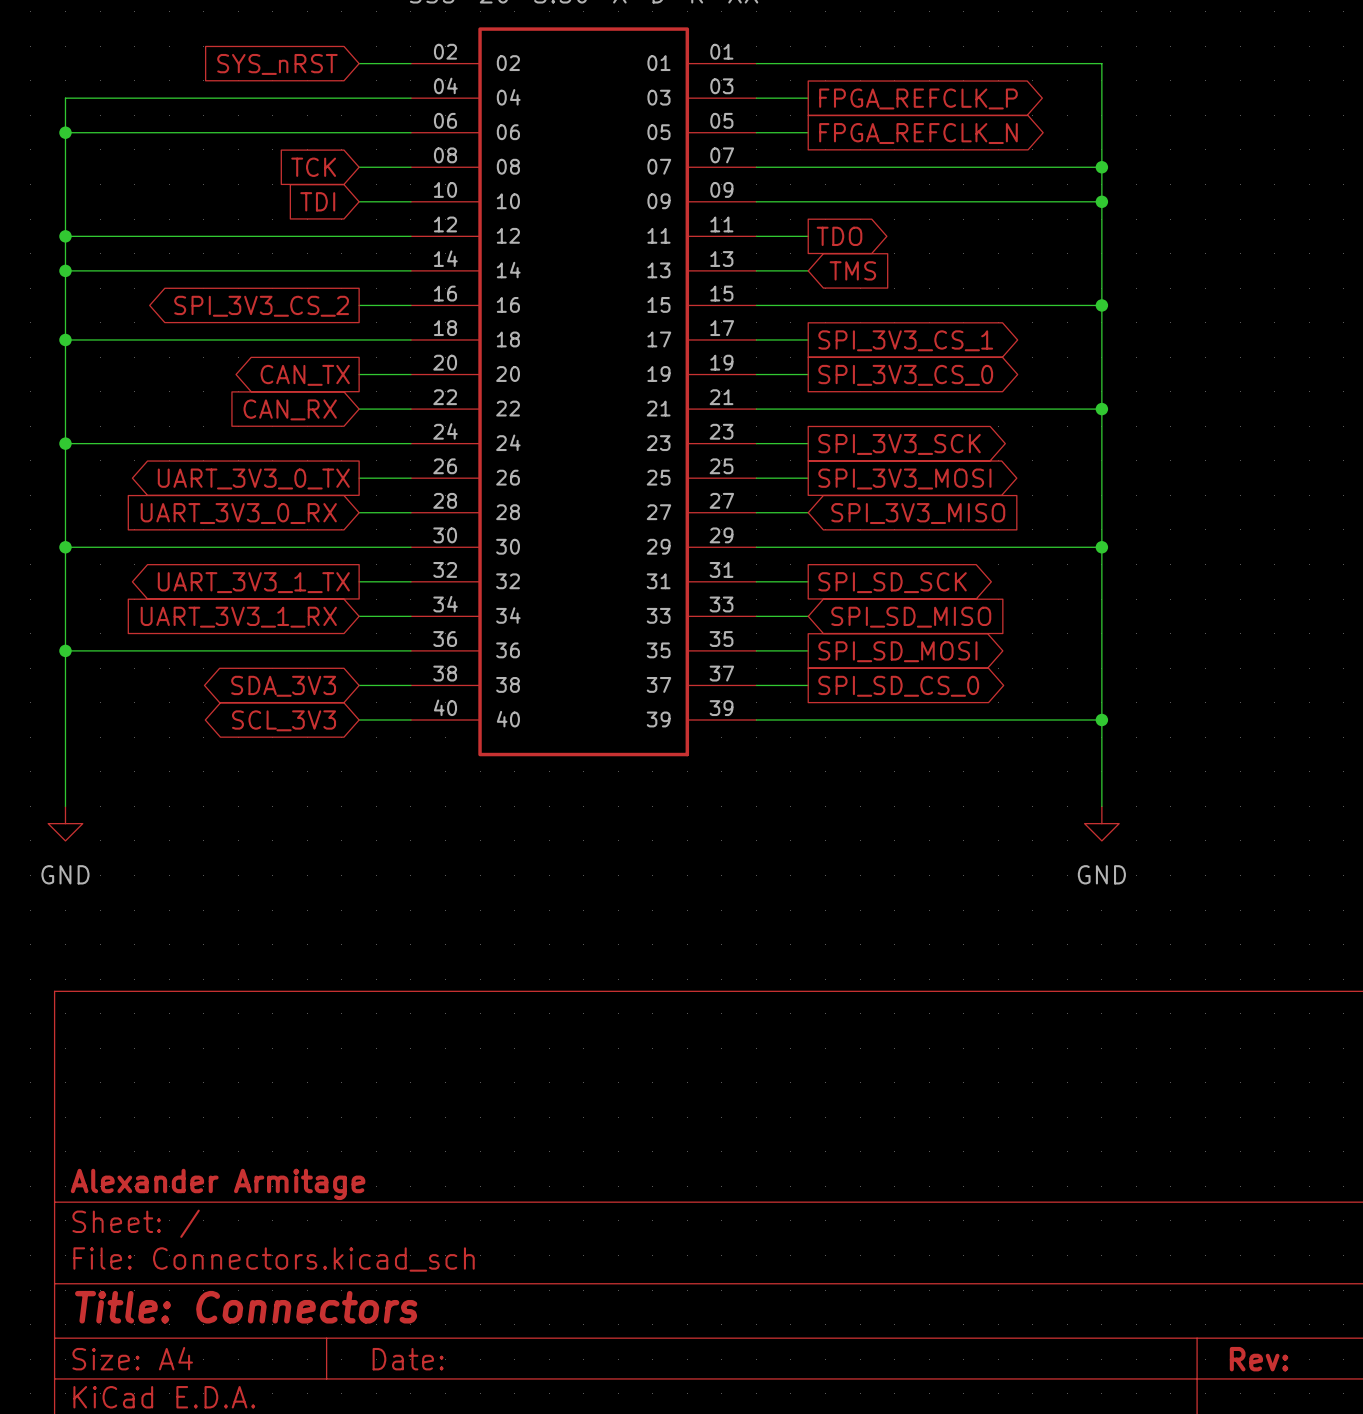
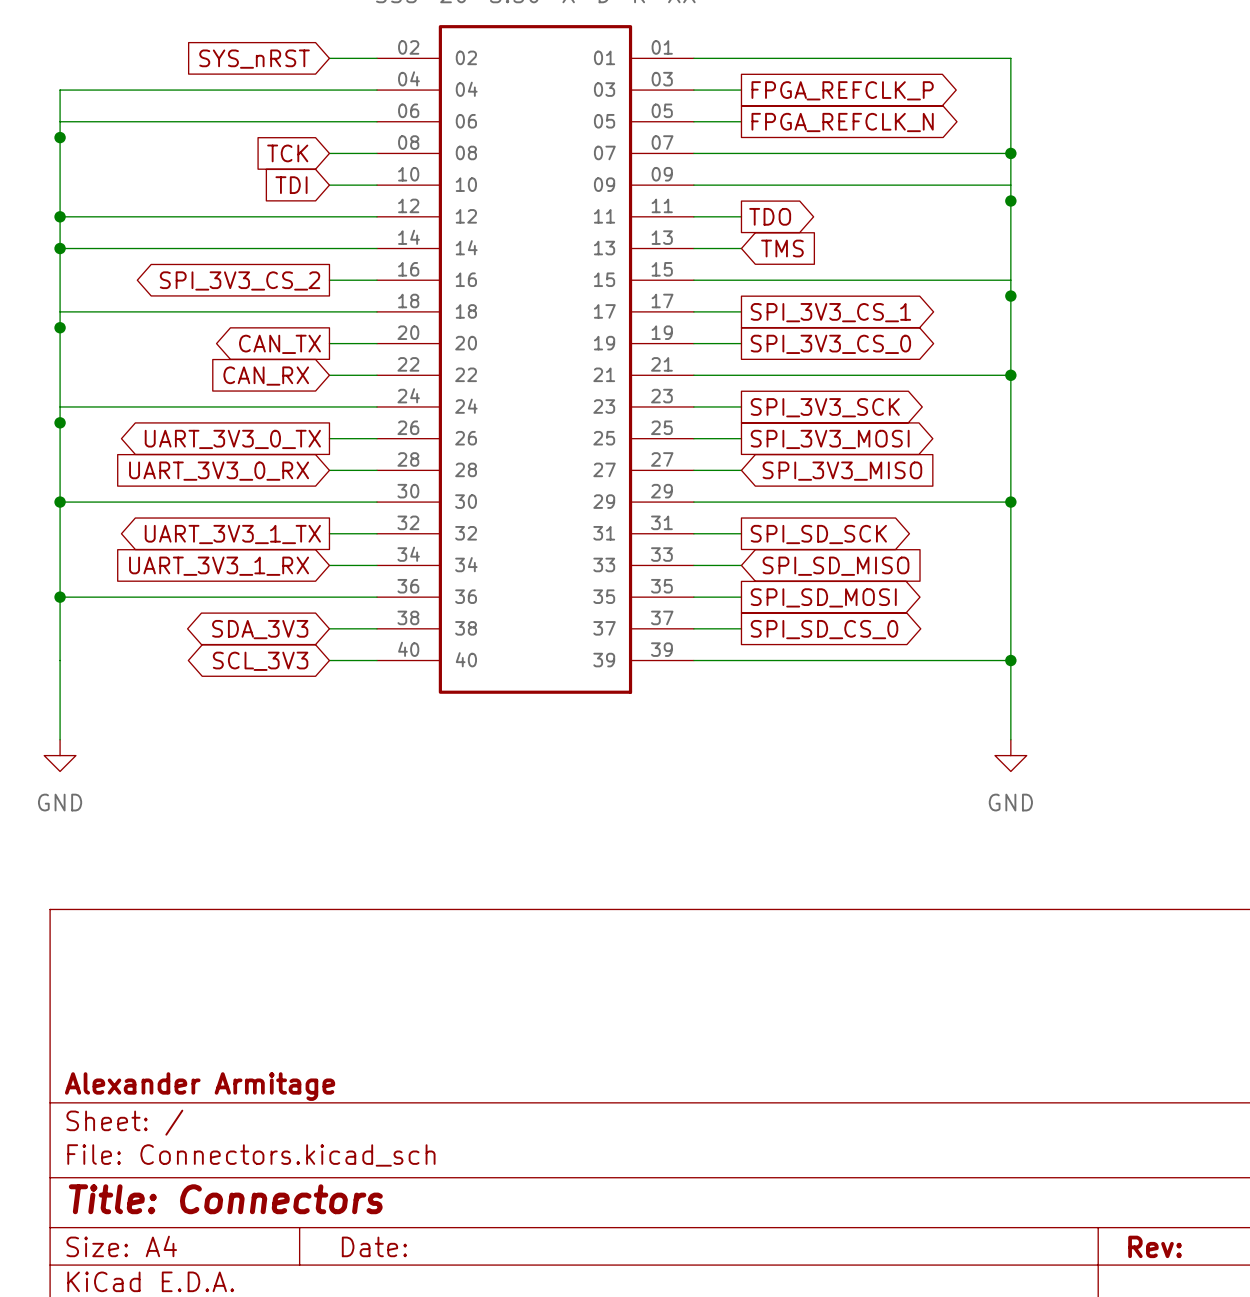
junction position: (65, 132) -> (60, 137)
junction position: (1101, 201) -> (1010, 200)
junction position: (1101, 305) -> (1010, 296)
junction position: (65, 339) -> (60, 327)
junction position: (65, 443) -> (60, 422)

